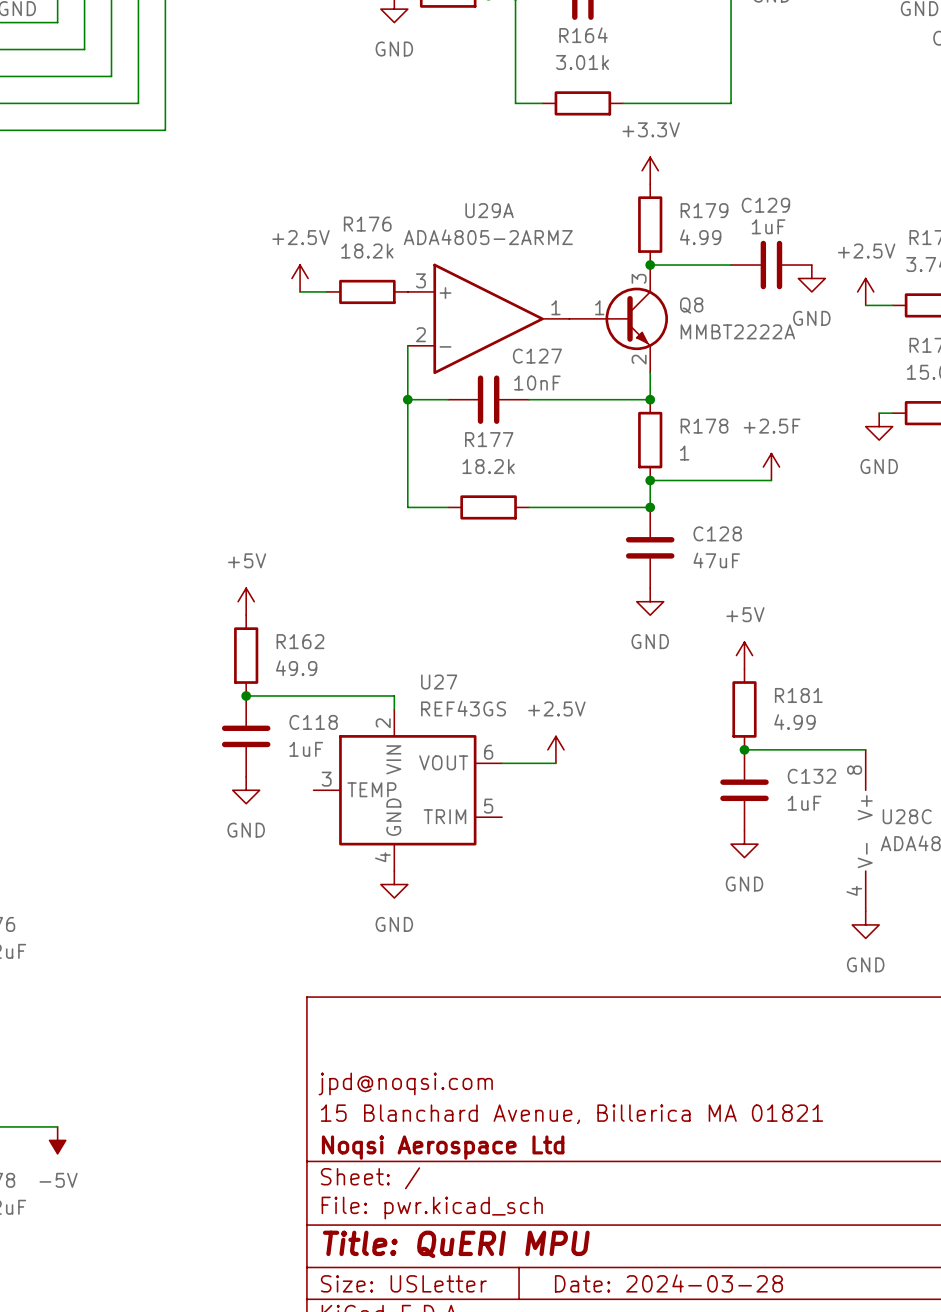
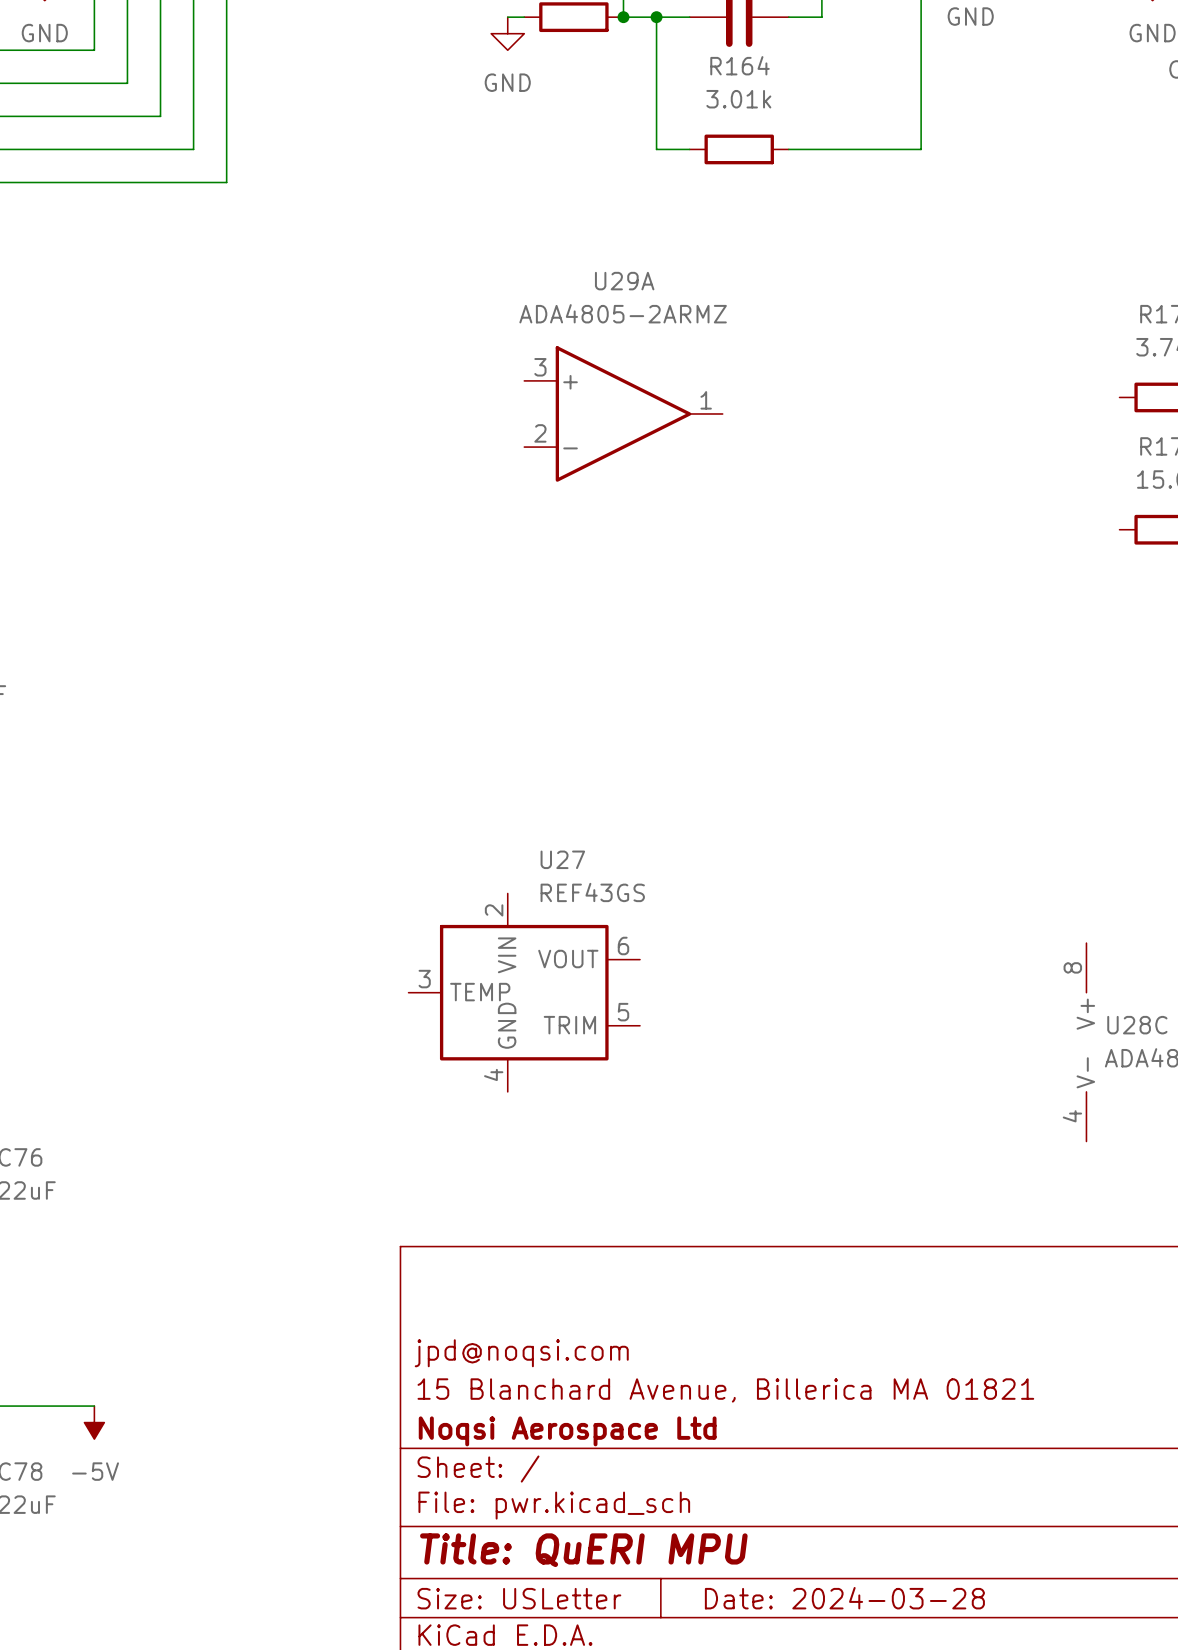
power symbol: +3.3V (650, 170) -> none
R179: 4.99 (650, 224) -> none
wire: (650, 265) (731, 265) -> none
junction: (650, 265) -> none
C129: 1uF (771, 265) -> none
power symbol: +2.5V (300, 278) -> none
power symbol: GND (811, 278) -> none
wire: (300, 291) (326, 291) -> none
R176: 18.2k (367, 291) -> none
power symbol: +2.5V (865, 291) -> none
wire: (865, 305) (892, 305) -> none
Q8: MMBT2222A (618, 318) -> none
wire: (407, 345) (407, 507) (448, 507) -> none
wire: (650, 372) (650, 399) (529, 399) -> none
wire: (407, 399) (448, 399) -> none
junction: (407, 399) -> none
C127: 10nF (488, 399) -> none
junction: (650, 399) -> none
wire: (879, 413) (892, 413) -> none
power symbol: GND (879, 426) -> none
R178: 1 (650, 440) -> none
power symbol: +2.5F (771, 467) -> none
junction: (650, 480) -> none
wire: (771, 480) (650, 480) (650, 507) (529, 507) -> none
R177: 18.2k (488, 507) -> none
junction: (650, 507) -> none
C128: 47uF (650, 547) -> none
power symbol: +5V (246, 601) -> none
power symbol: GND (650, 601) -> none
R162: 49.9 (246, 655) -> none
power symbol: +5V (744, 655) -> none
wire: (246, 695) (394, 695) (394, 709) -> none
junction: (246, 695) -> none
R181: 4.99 (744, 709) -> none
C118: 1uF (246, 736) -> none
power symbol: +2.5V (555, 749) -> none
wire: (744, 749) (865, 749) -> none
junction: (744, 749) -> none
wire: (502, 763) (555, 763) -> none
power symbol: GND (246, 790) -> none
C132: 1uF (744, 790) -> none
power symbol: GND (744, 844) -> none
power symbol: GND (394, 884) -> none
power symbol: GND (865, 924) -> none

